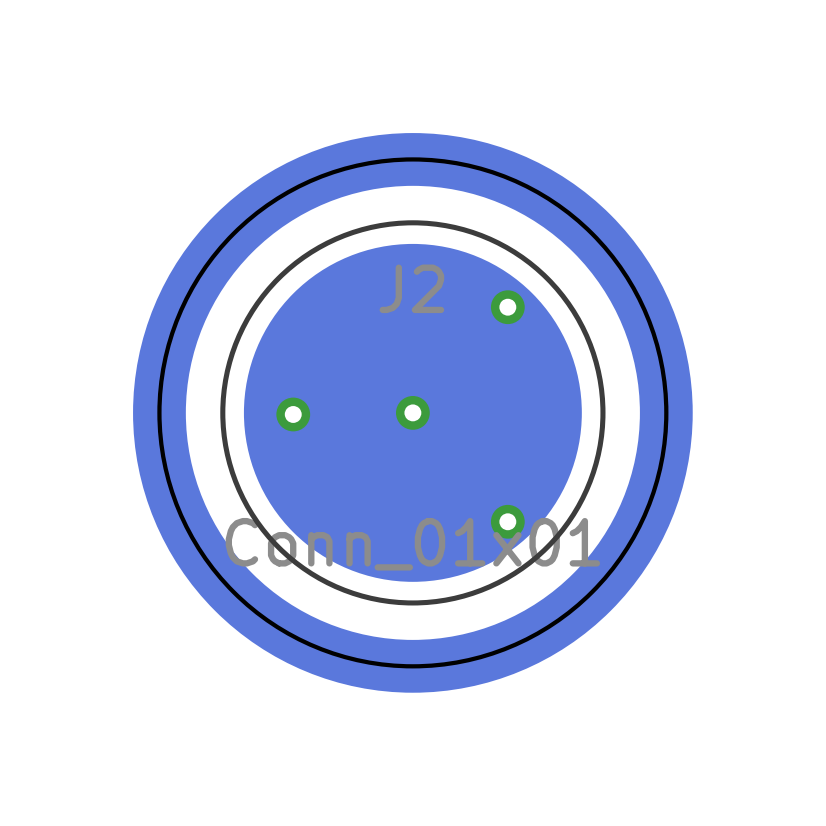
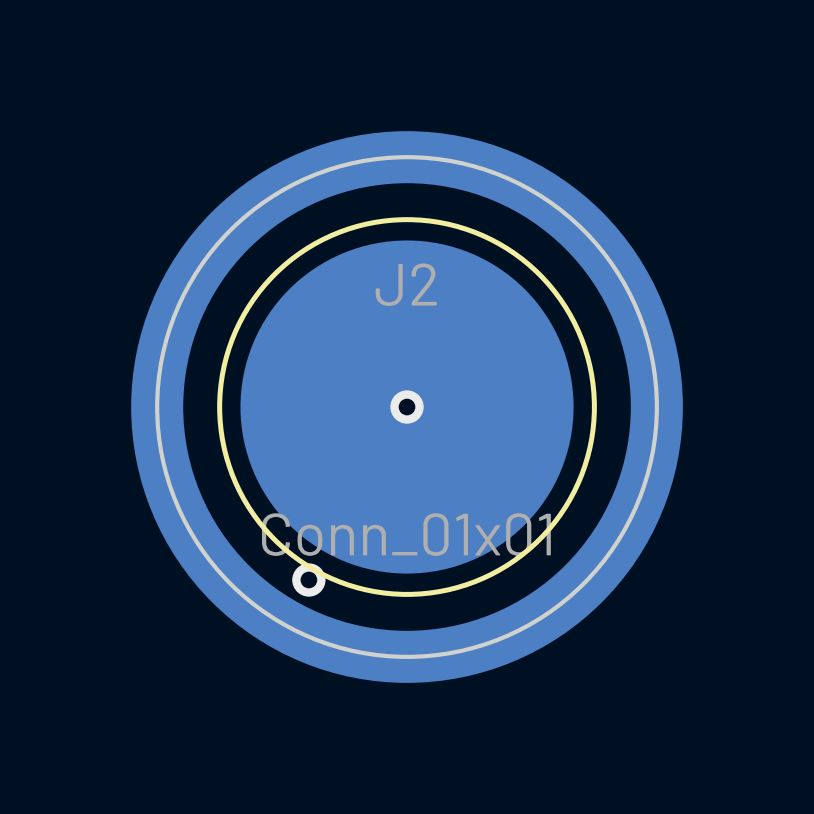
via: (507, 307) -> none
via: (293, 414) -> none
via: (507, 521) -> none
via: none -> (308, 579)

